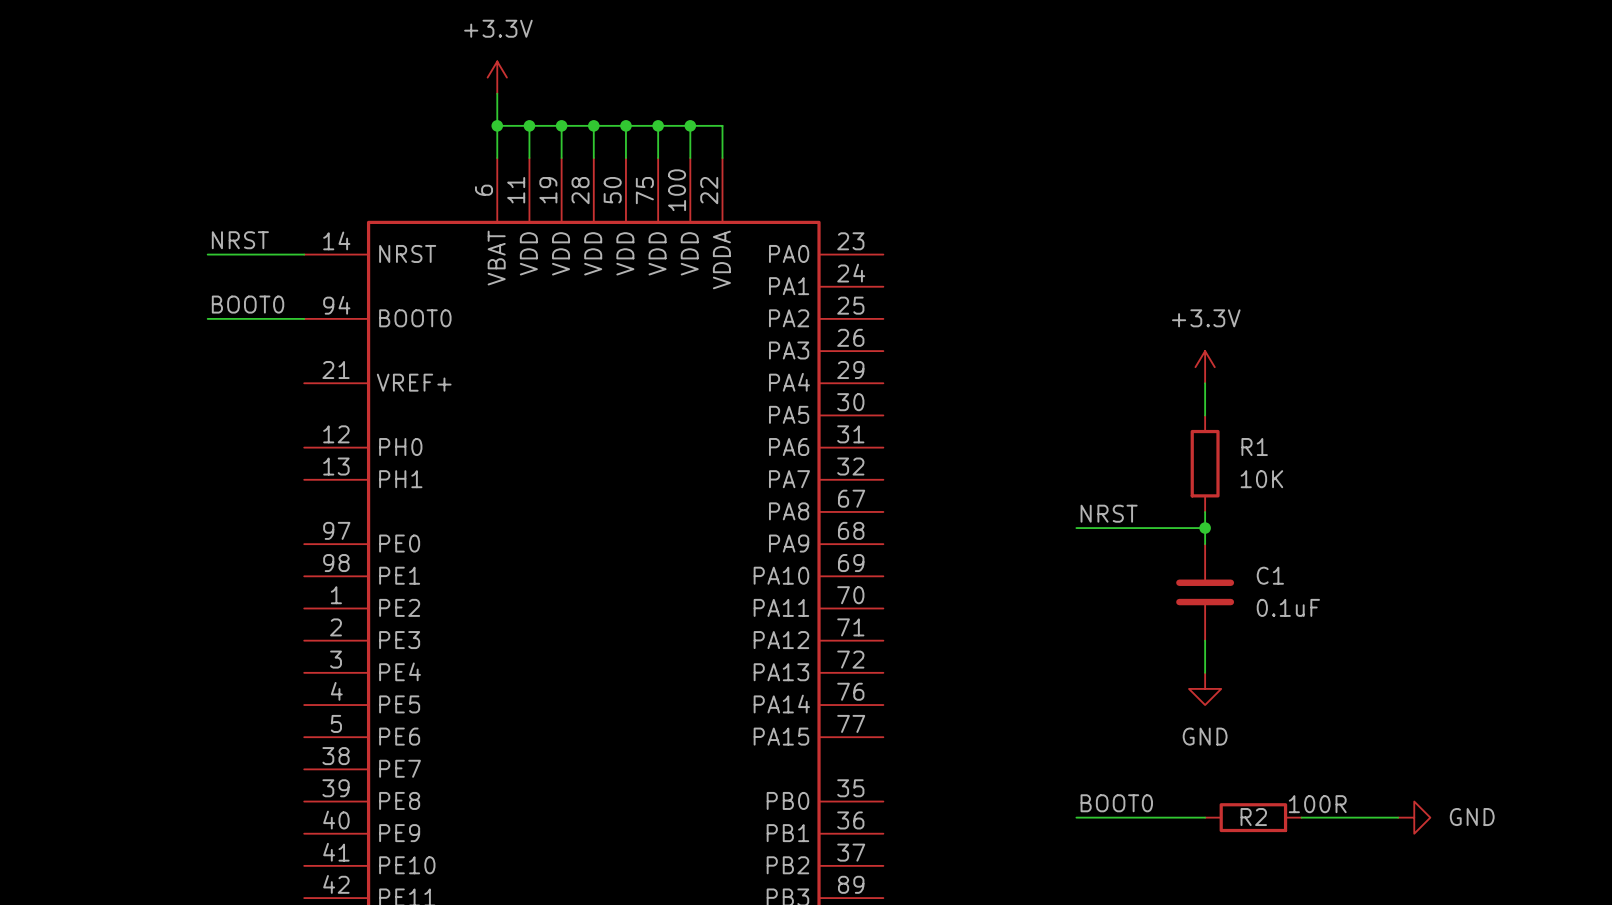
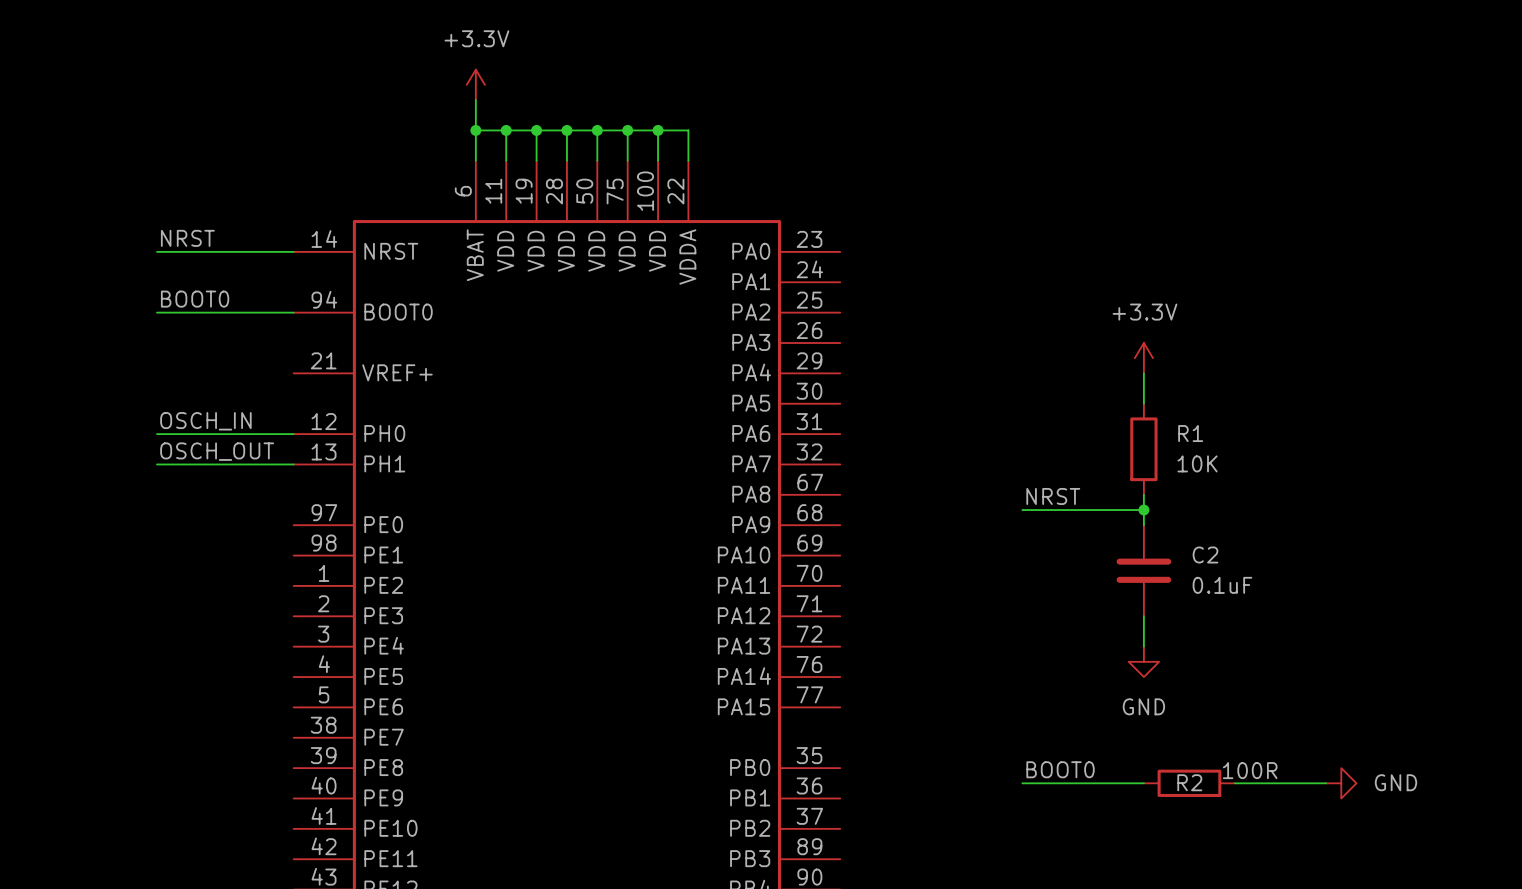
label position: NRST (240, 240) -> NRST (187, 238)
wire: none -> (157, 251) (202, 251)
label position: BOOT0 (248, 304) -> BOOT0 (195, 299)
wire: none -> (157, 312) (202, 312)
label: none -> OSCH_IN (205, 421)
wire: none -> (157, 434) (293, 434)
label: none -> OSCH_OUT (217, 451)
wire: none -> (157, 464) (293, 464)
C1 name: C1 (1270, 575) -> C2 (1205, 555)

